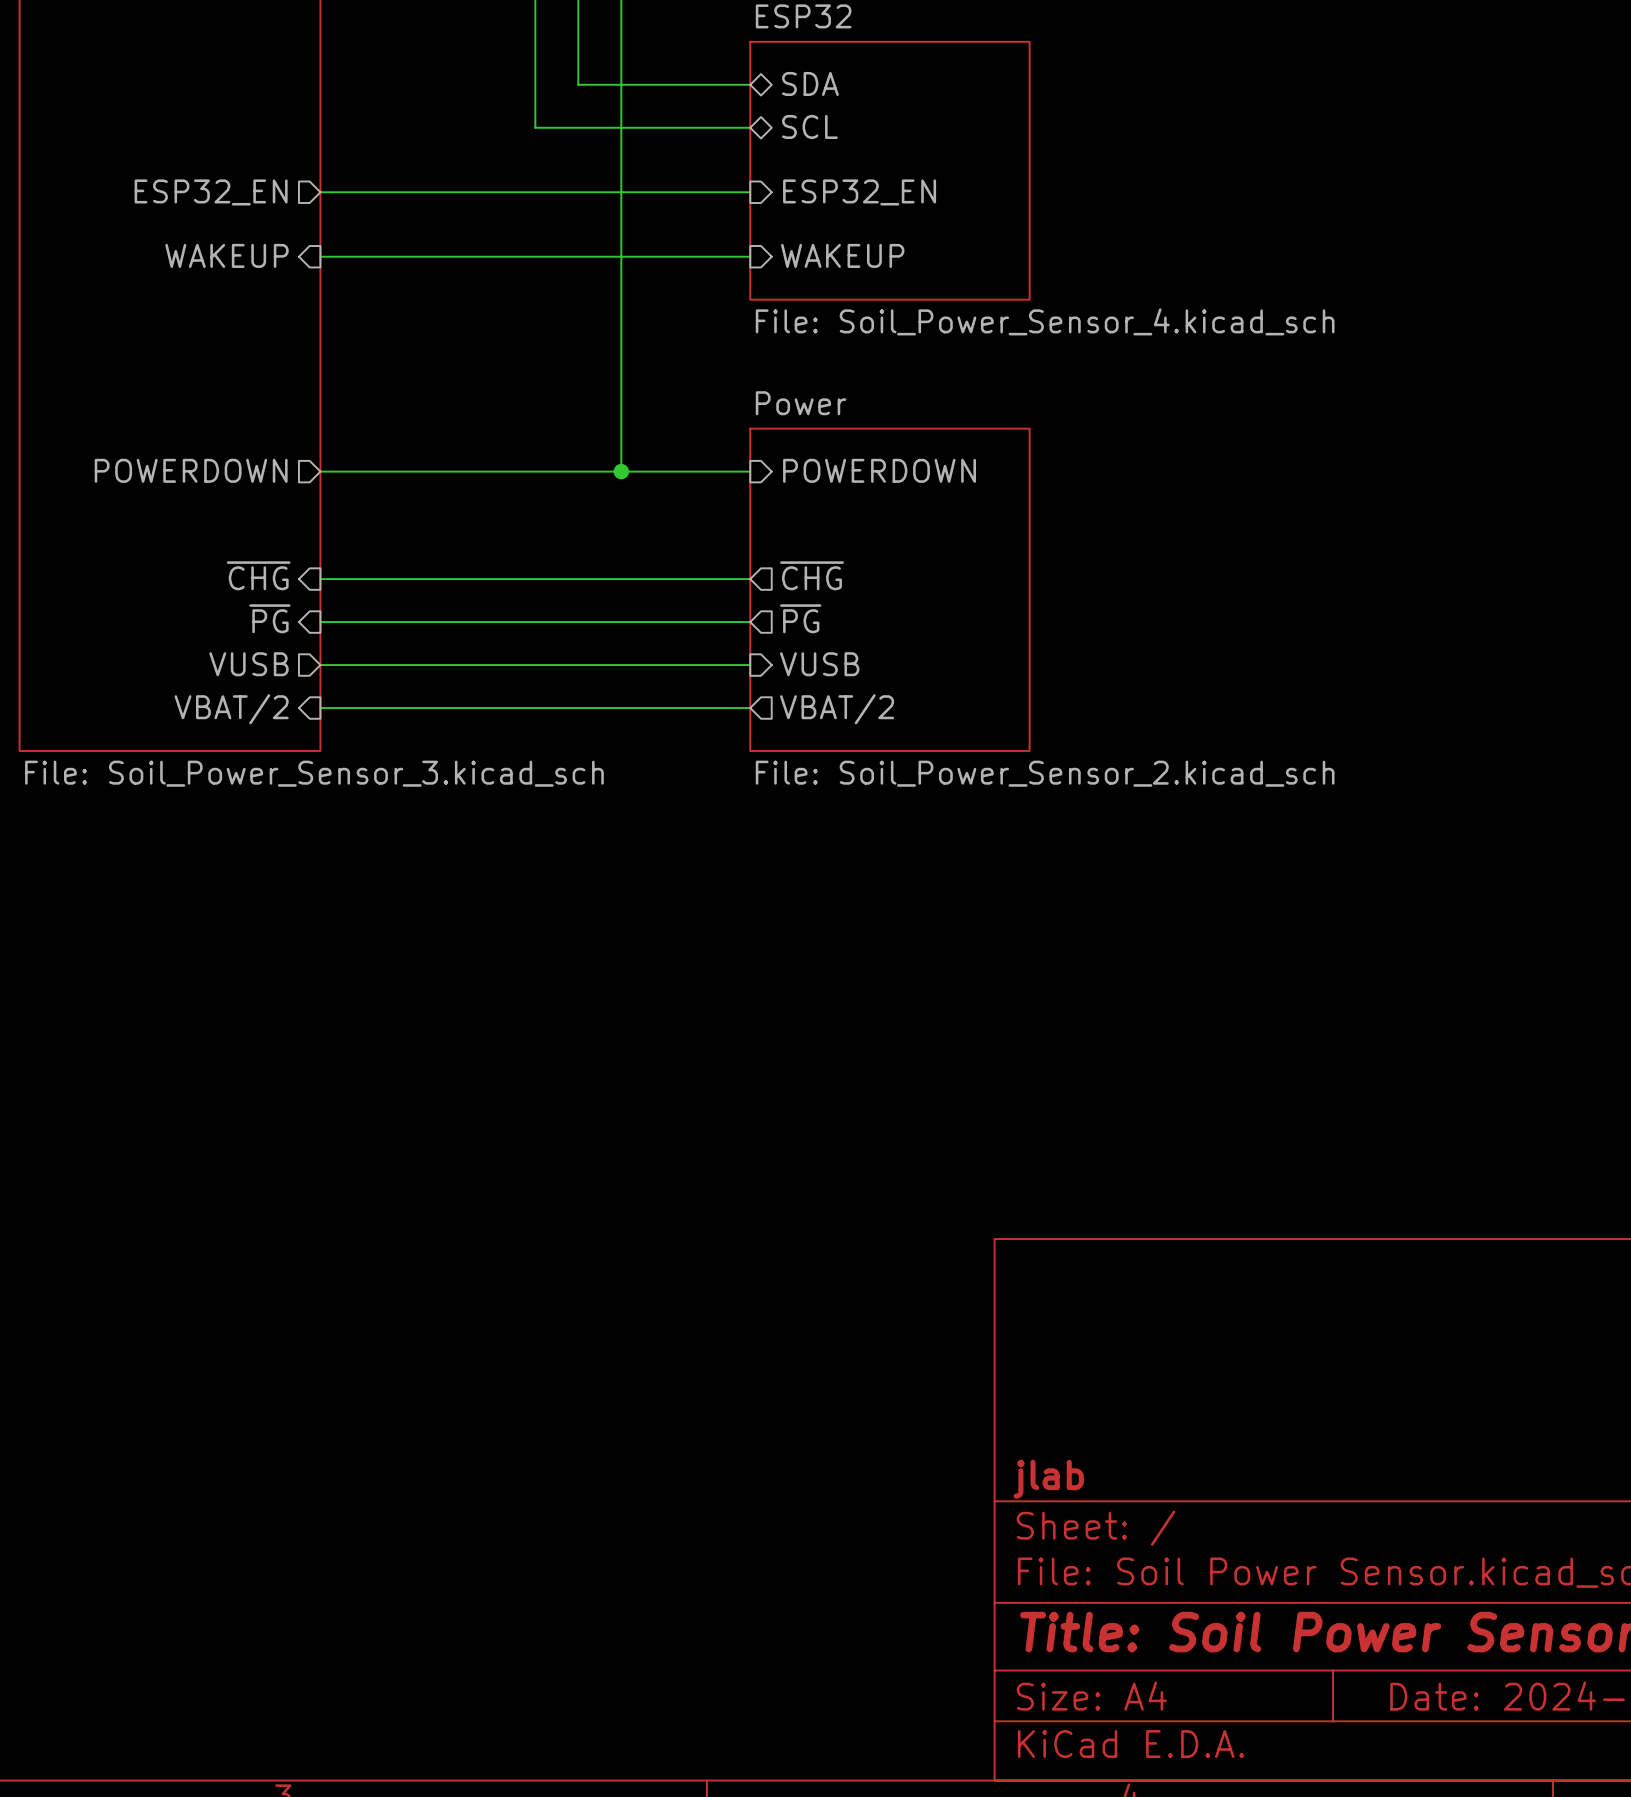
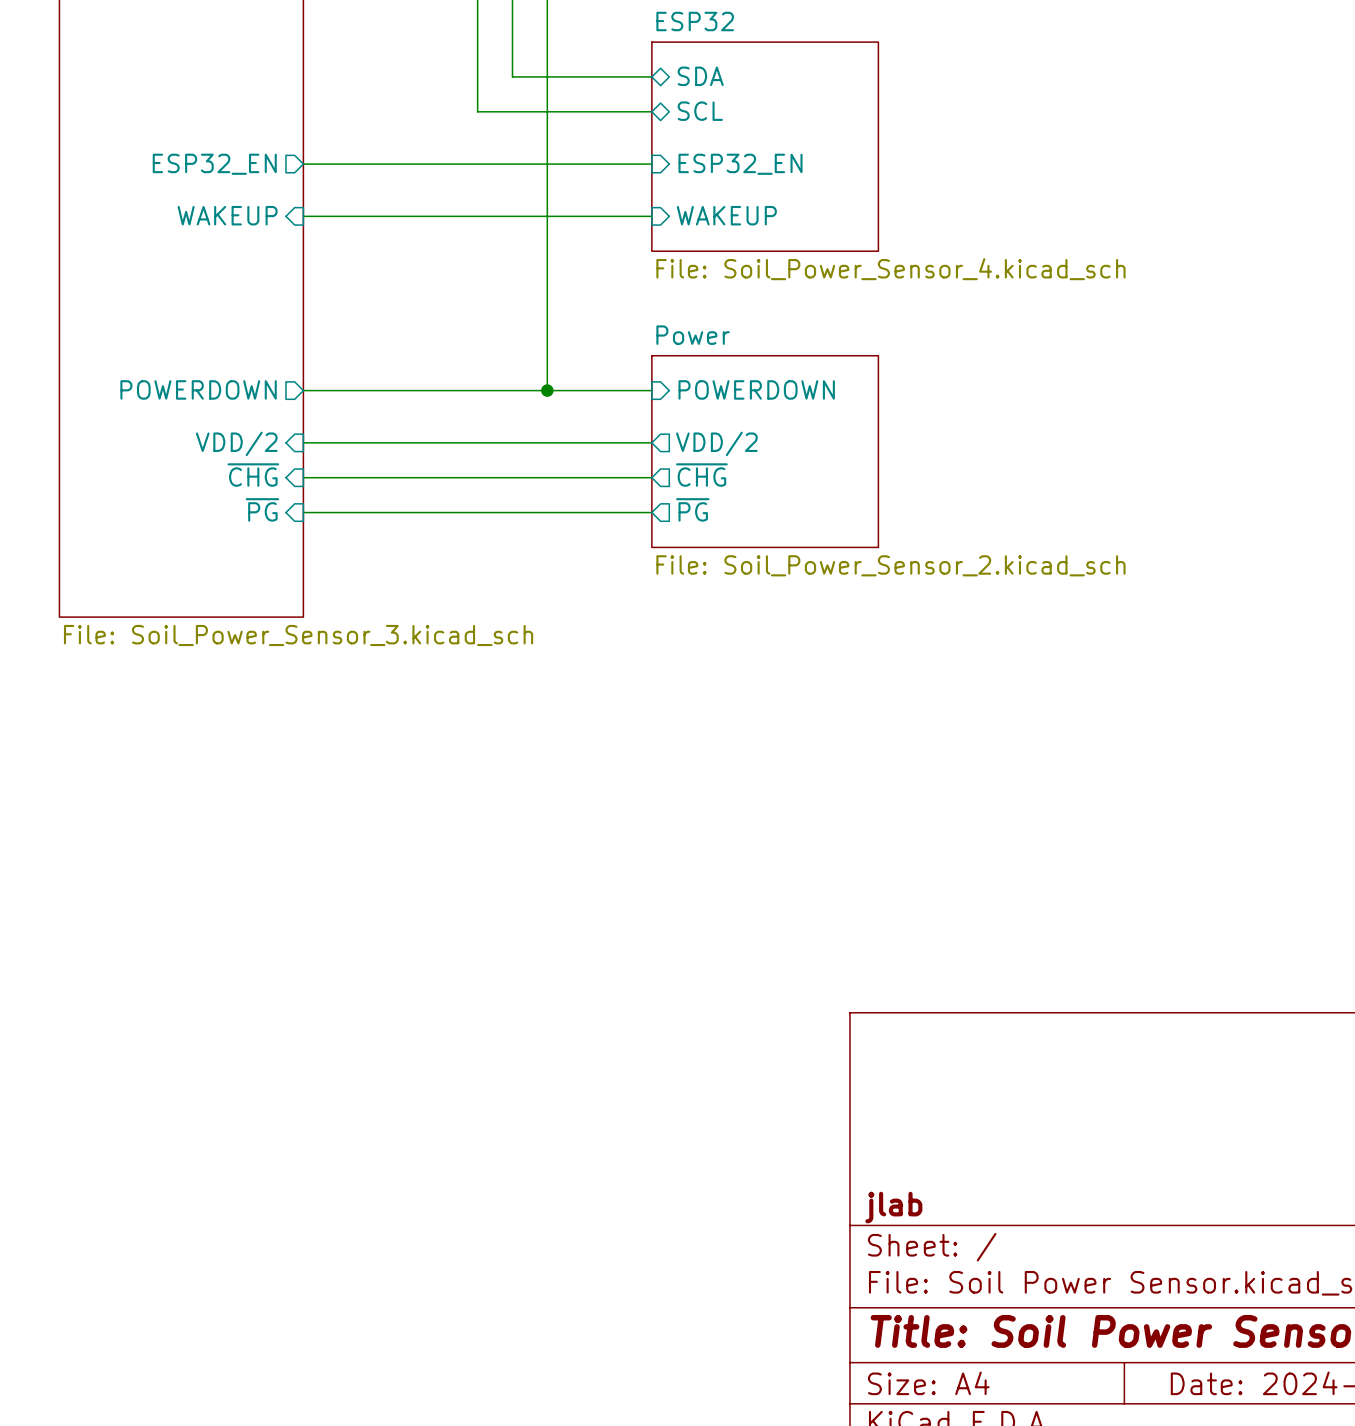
sheet pin: none -> VDD/2 (236, 443)
sheet pin: none -> VDD/2 (716, 443)
sheet Power: none -> File: Soil_Power_Sensor_2.kicad_sch (765, 451)
sheet Power: File: Soil_Power_Sensor_2.kicad_sch (889, 589) -> none
sheet pin: VUSB (248, 664) -> none
sheet pin: VUSB (819, 664) -> none
wire: (320, 665) (750, 665) -> (303, 442) (651, 442)
wire: (320, 708) (750, 708) -> none
sheet pin: VBAT/2 (231, 709) -> none
sheet pin: VBAT/2 (837, 709) -> none

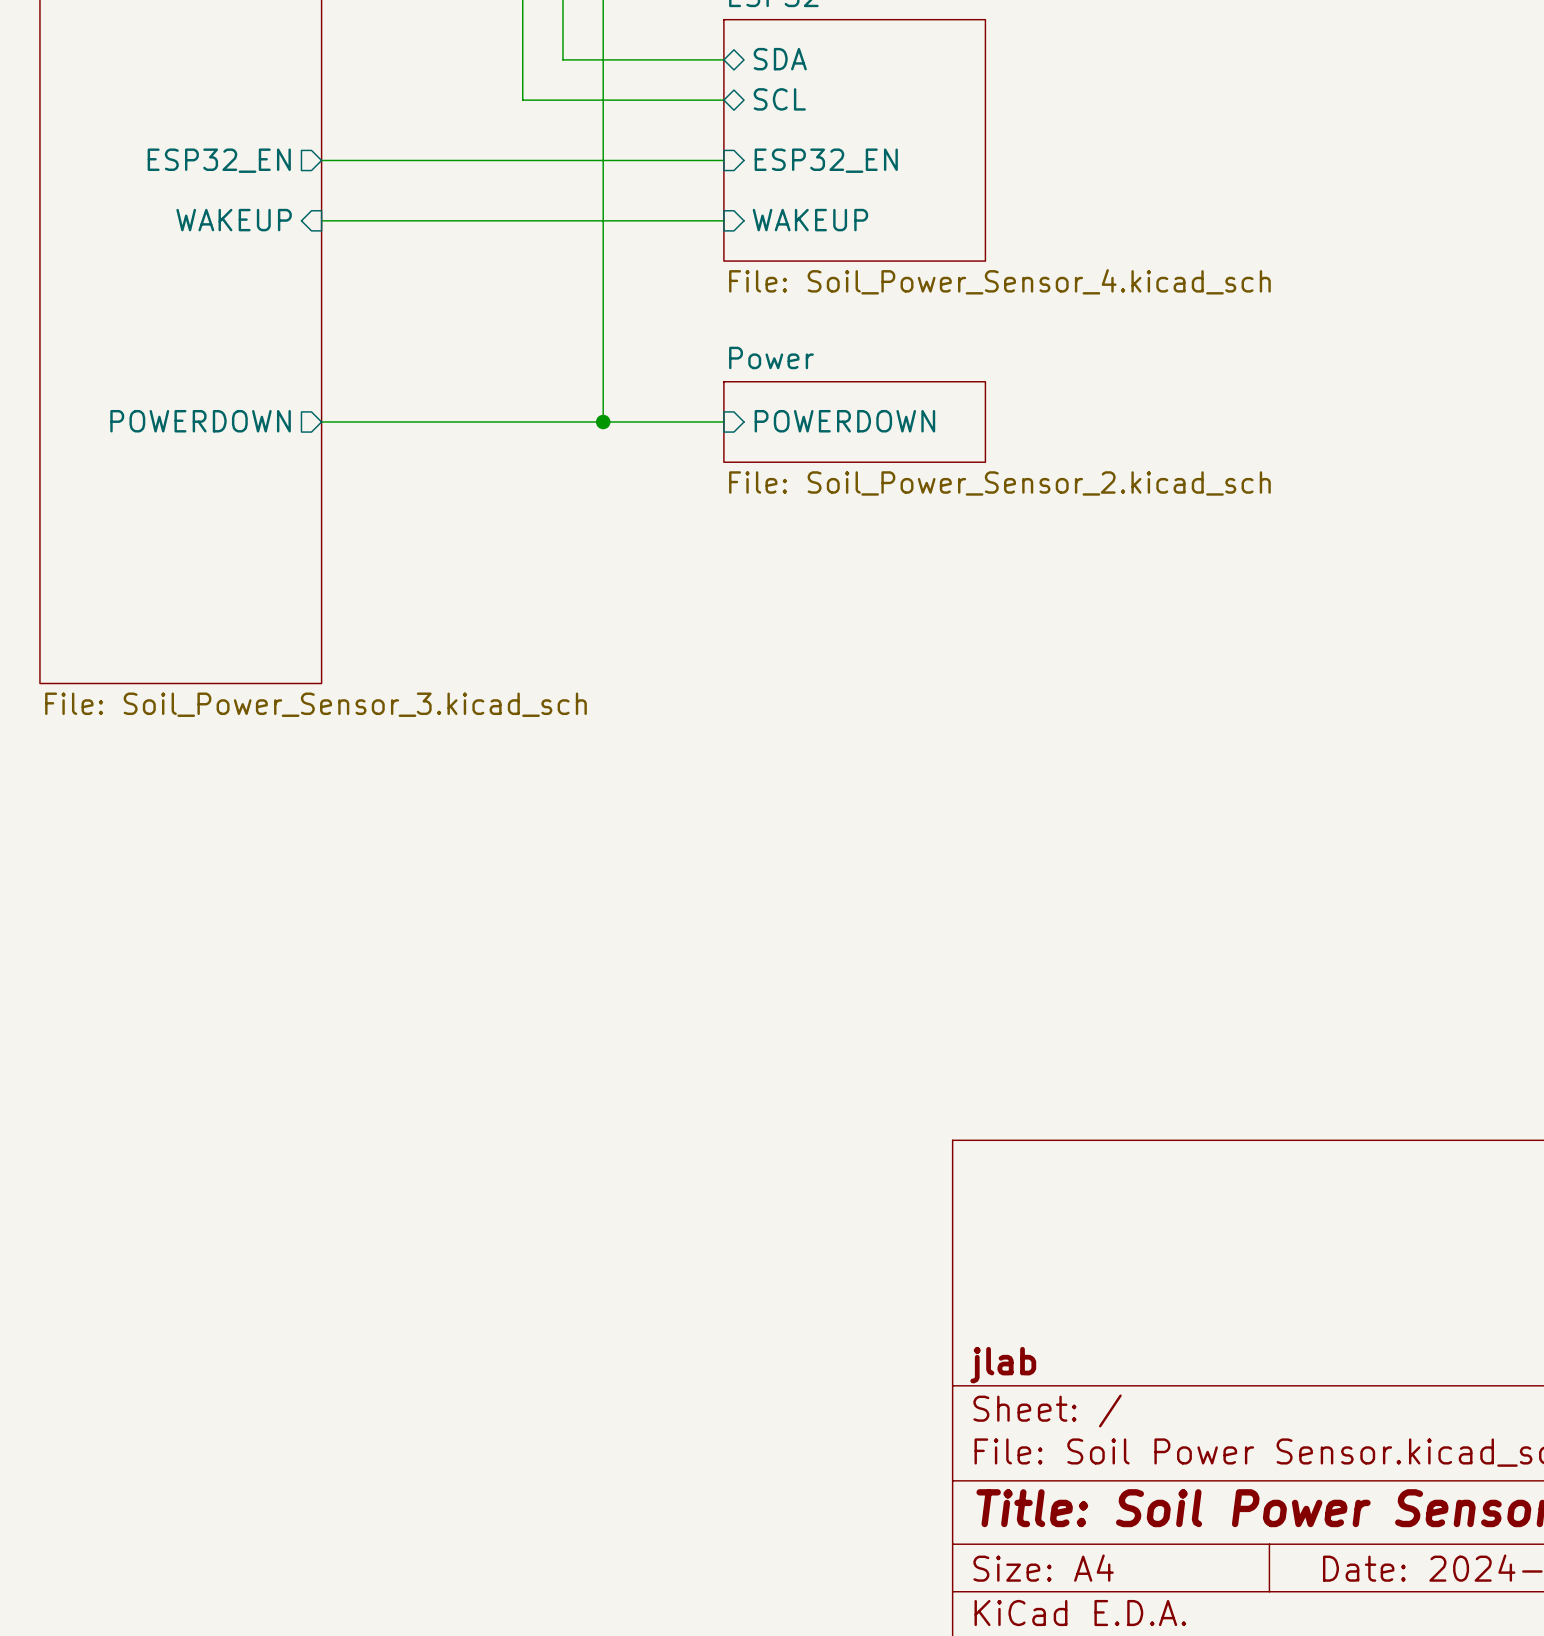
sheet Power: none -> File: Soil_Power_Sensor_2.kicad_sch (854, 421)
wire: (303, 442) (651, 442) -> none
sheet pin: VDD/2 (236, 443) -> none
sheet pin: VDD/2 (716, 443) -> none
sheet Power: File: Soil_Power_Sensor_2.kicad_sch (765, 451) -> none
sheet pin: ~{CHG} (253, 475) -> none
sheet pin: ~{CHG} (701, 475) -> none
wire: (303, 477) (651, 477) -> none
sheet pin: ~{PG} (262, 509) -> none
sheet pin: ~{PG} (692, 509) -> none
wire: (303, 512) (651, 512) -> none

